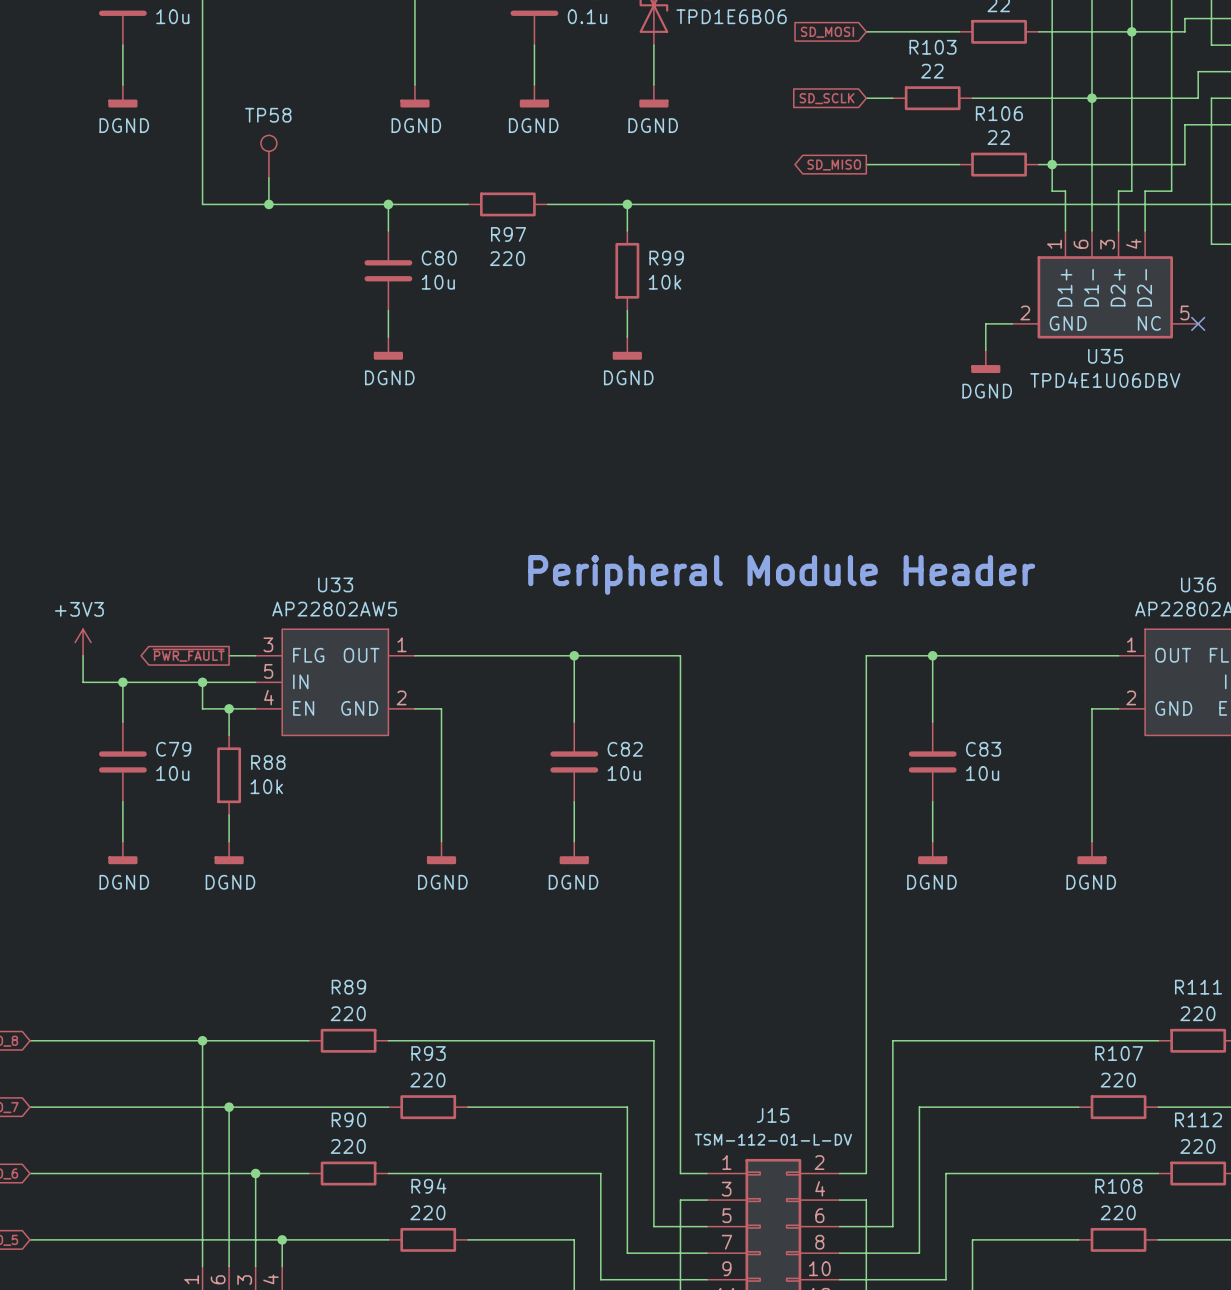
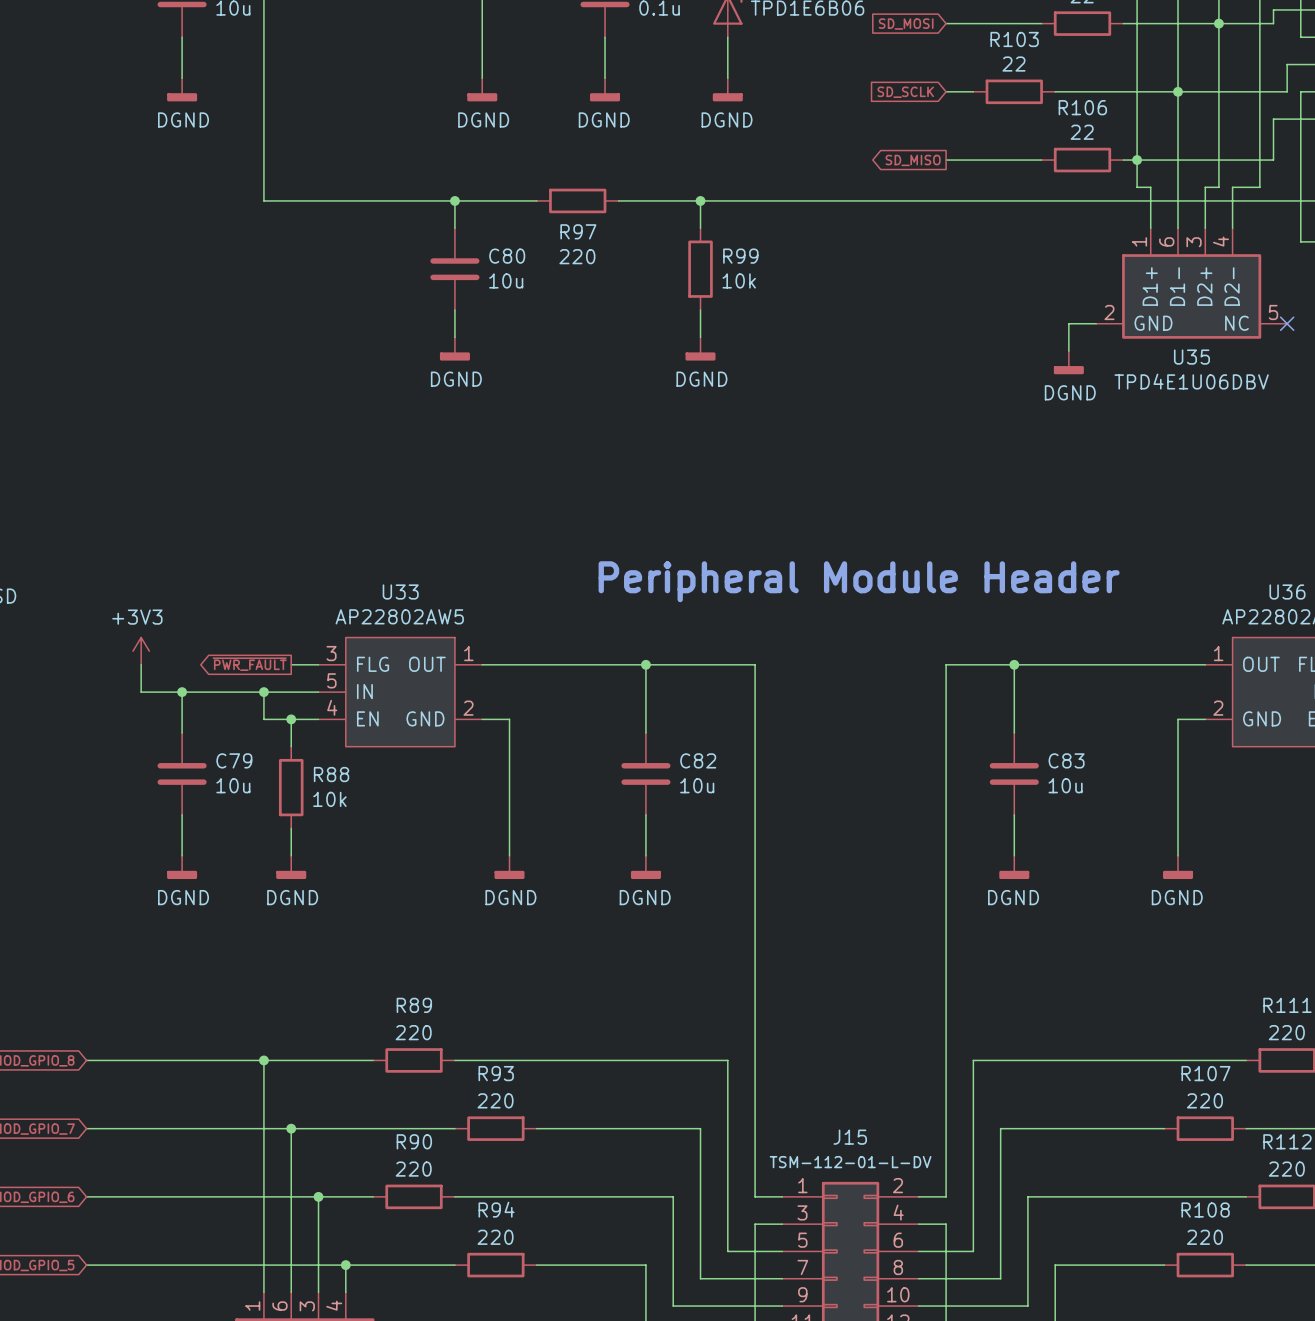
TP58: (268, 156) -> none
wire: (268, 177) (268, 204) -> none
junction: (268, 204) -> none

